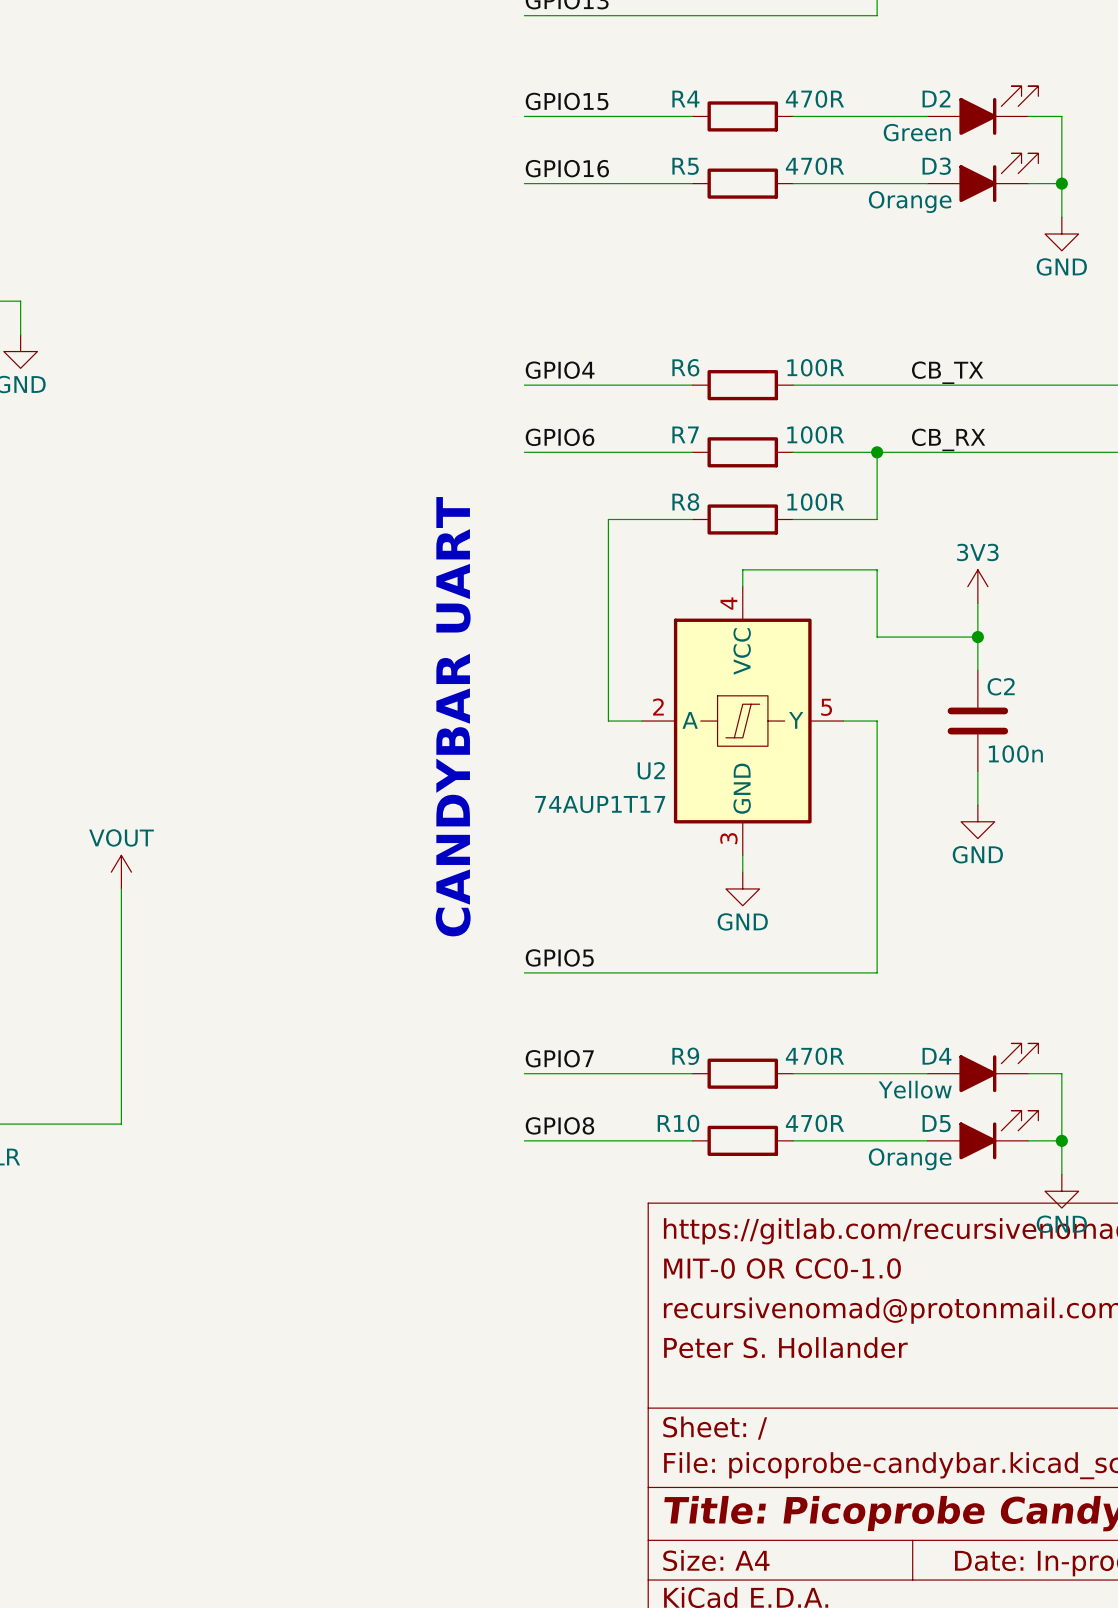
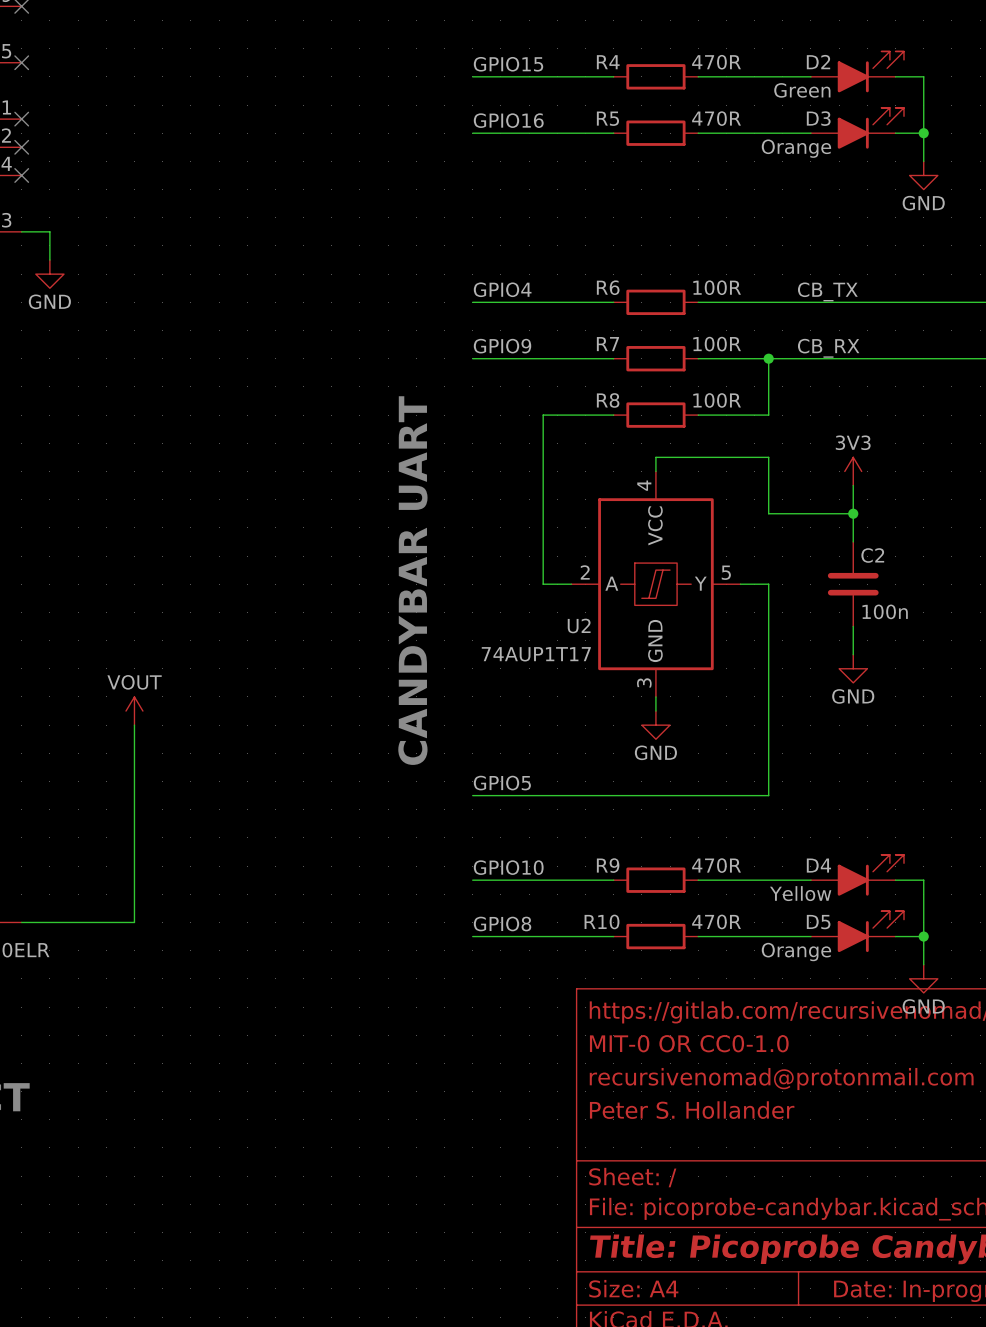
label: GPIO6 (560, 437) -> GPIO9 (502, 346)
label: GPIO7 (559, 1058) -> GPIO10 (508, 867)

